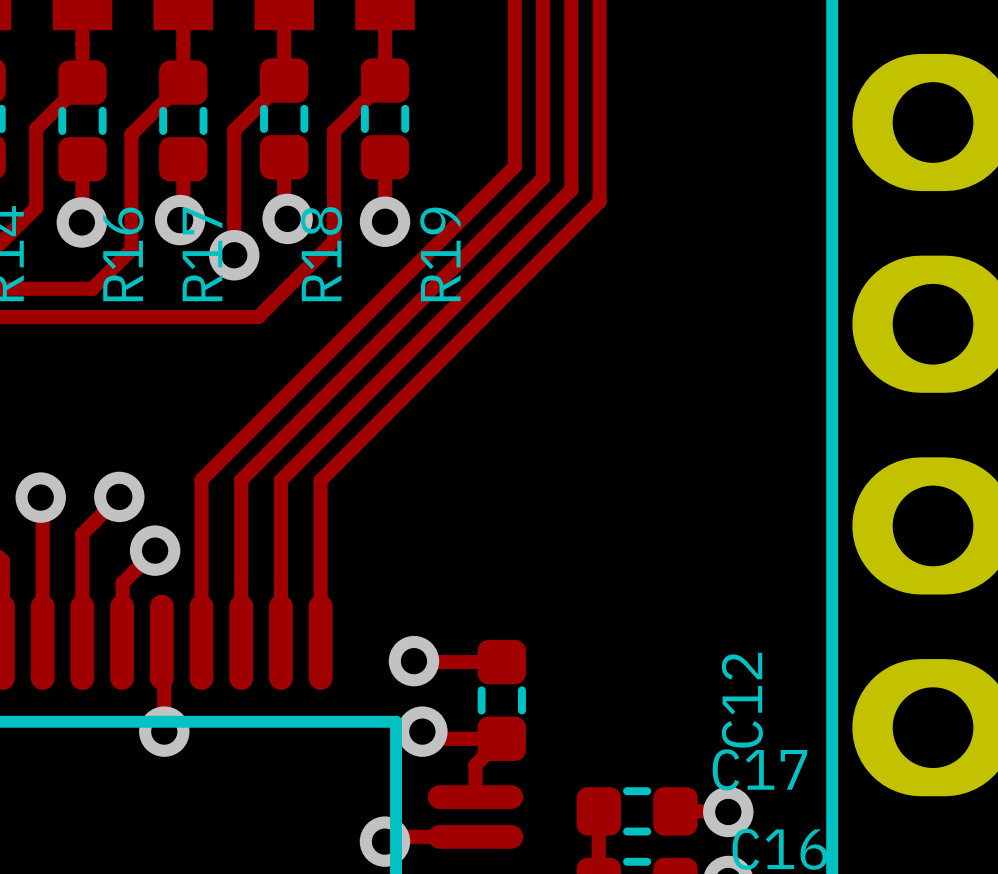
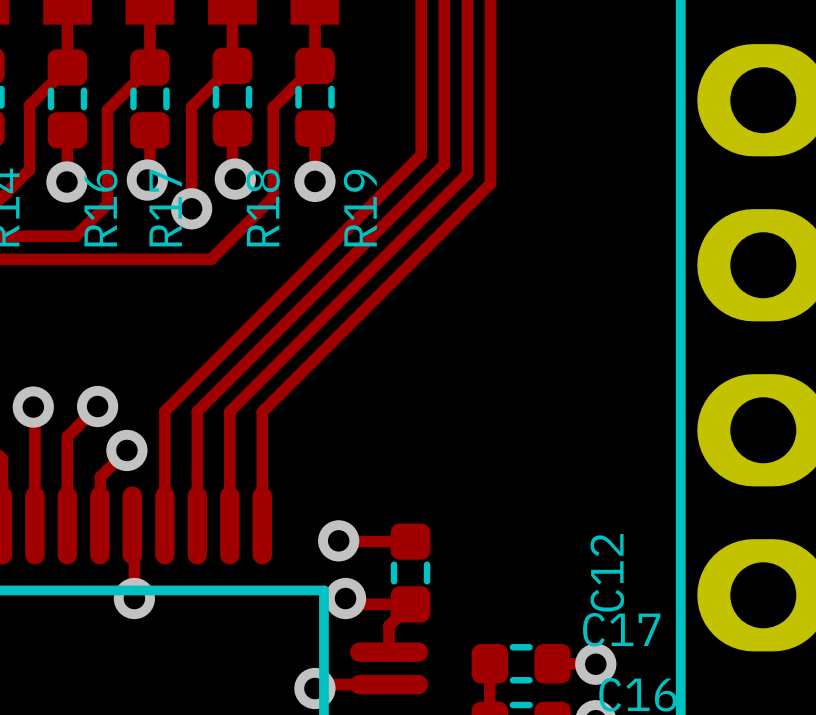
track: (514, 166) (201, 479) (201, 502) -> (421, 136) (421, 155) (164, 411)
track: (543, 178) (241, 480) (241, 503) -> (444, 145) (444, 164) (197, 411)
track: (571, 189) (280, 480) (280, 503) -> (467, 155) (467, 174) (229, 411)
track: (599, 201) (320, 480) (320, 503) -> (490, 164) (490, 183) (262, 411)

